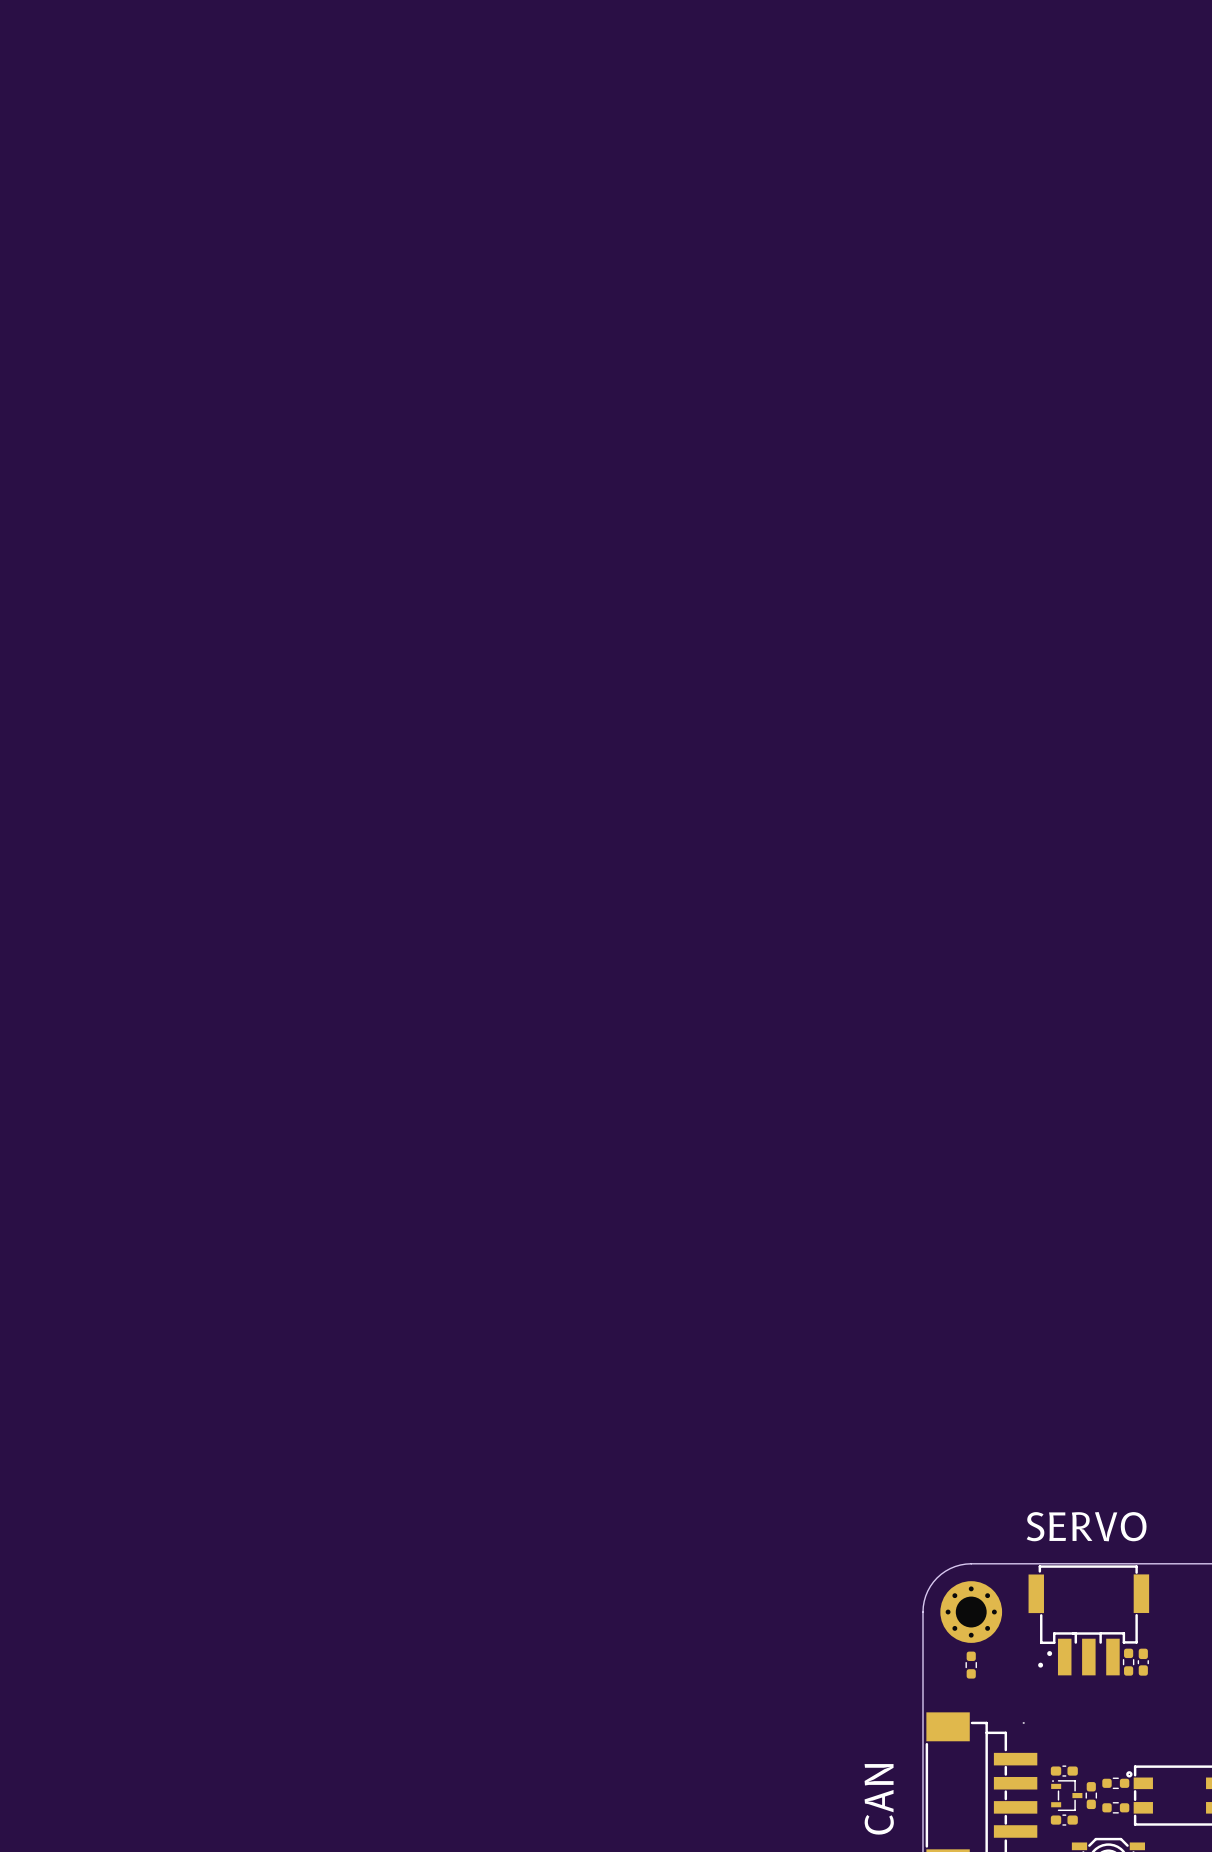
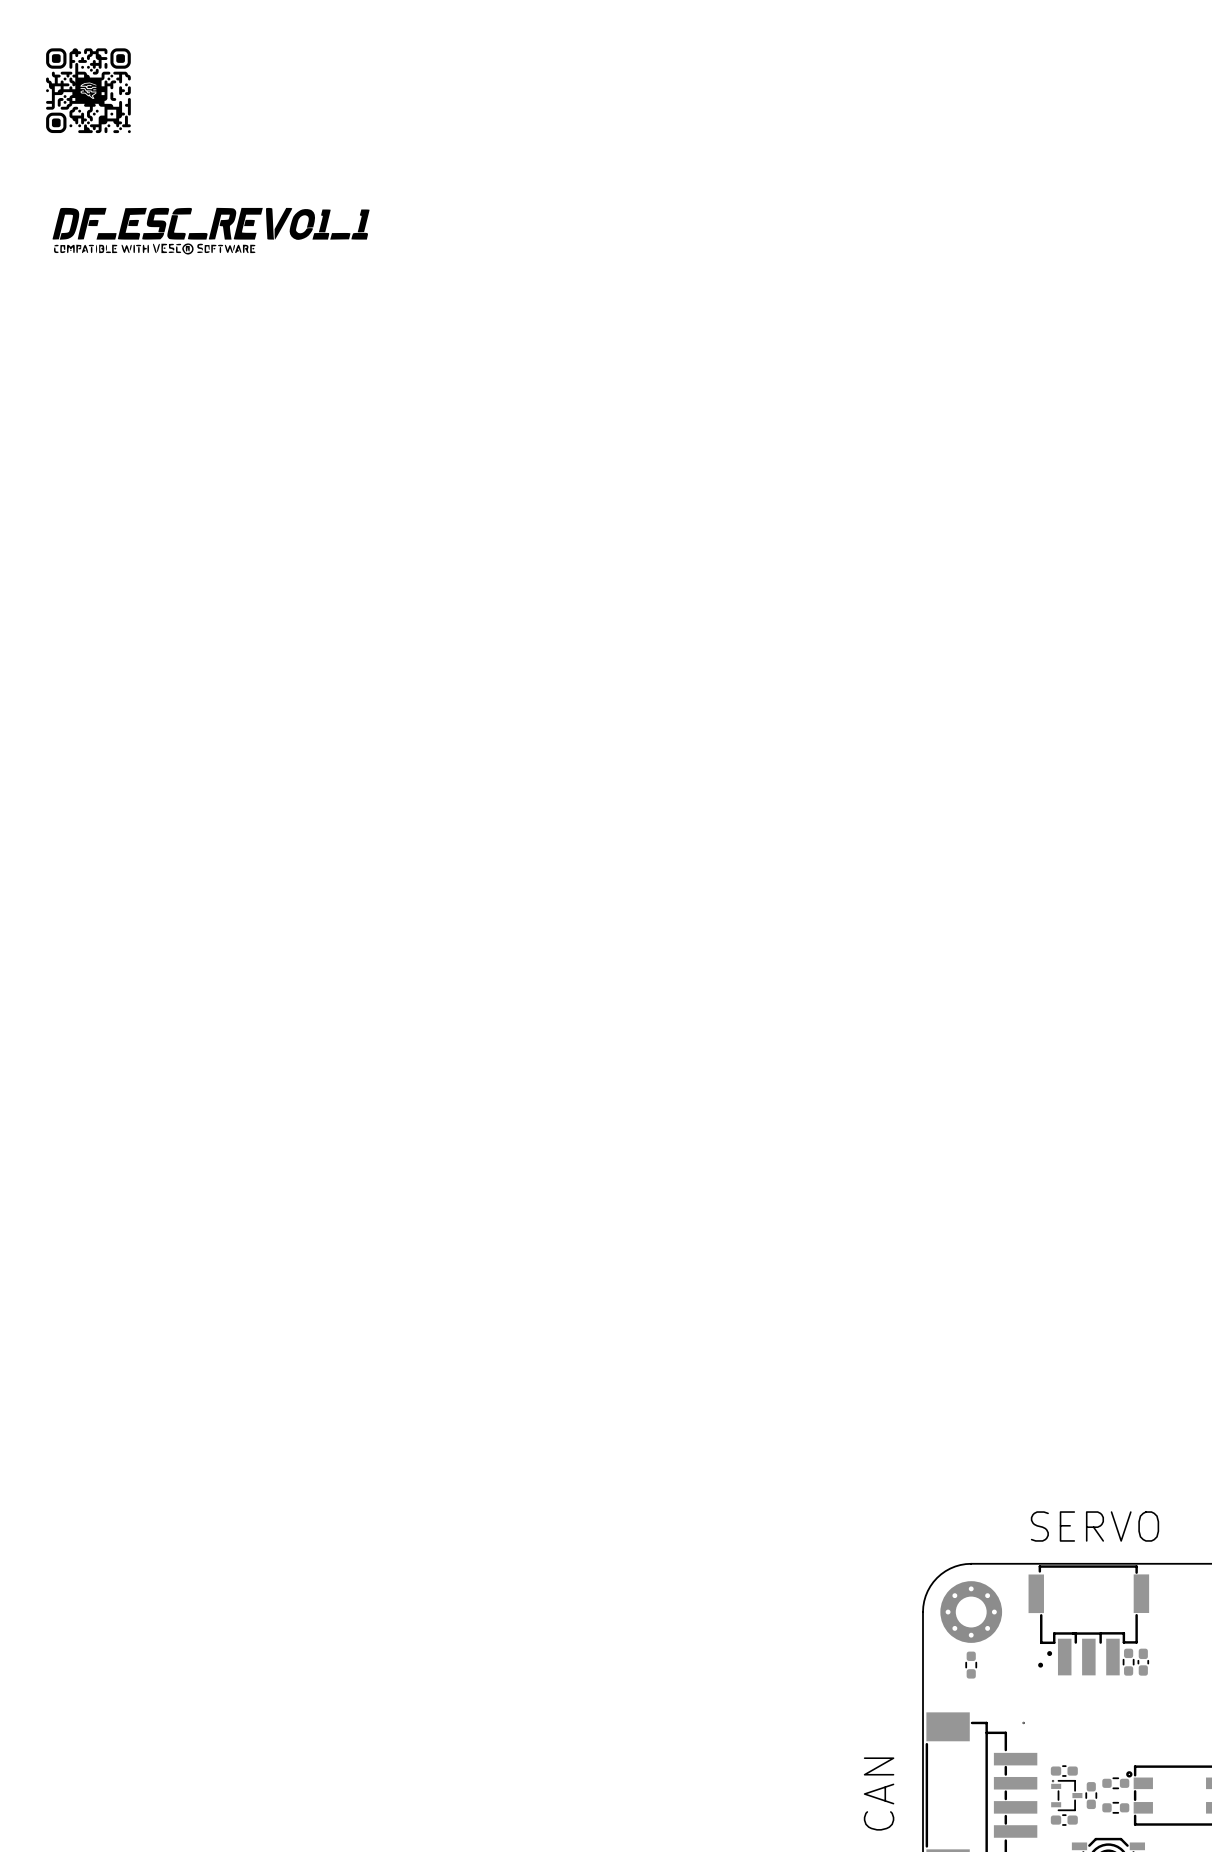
drawing: none -> [46, 48, 131, 134]
drawing: none -> [52, 207, 370, 255]

